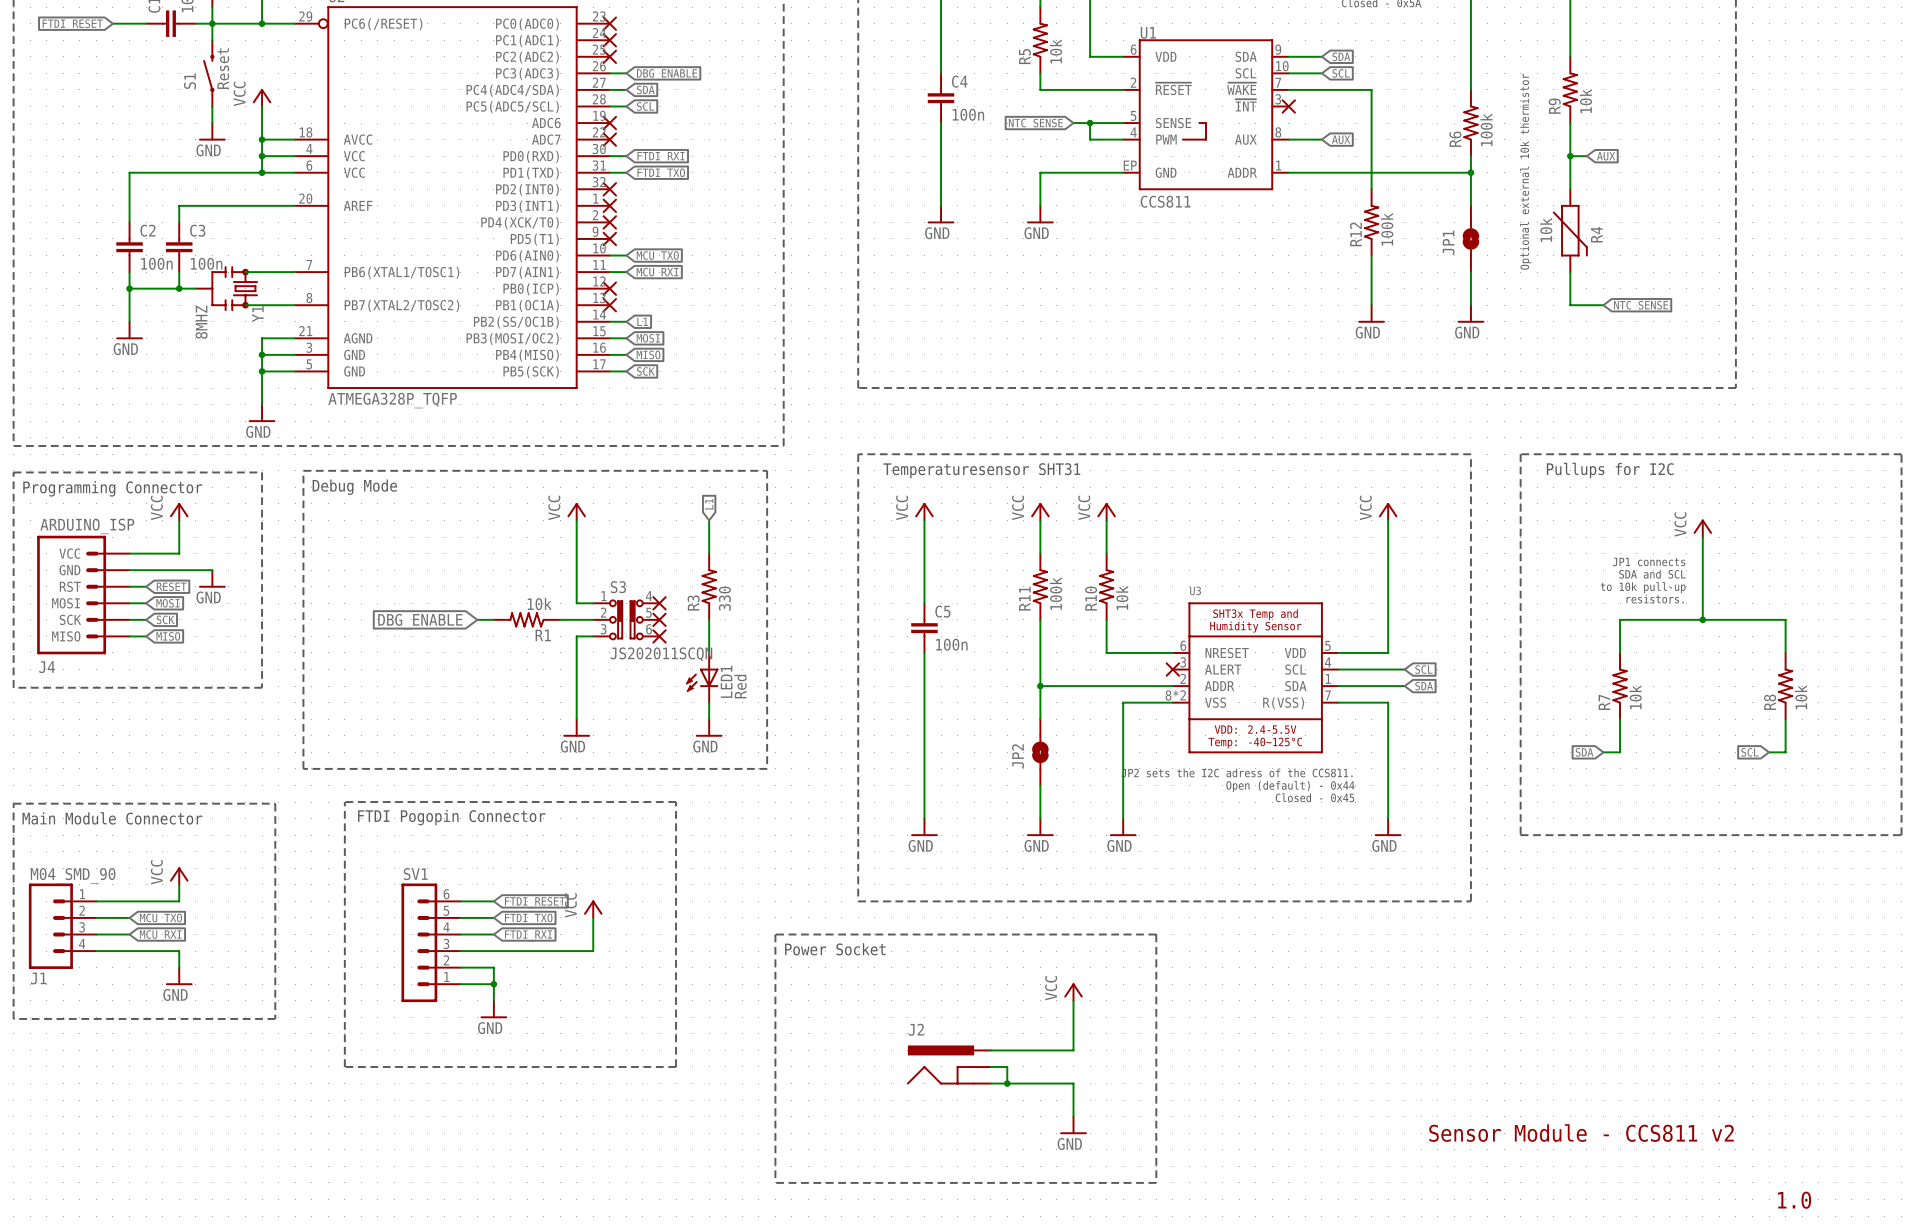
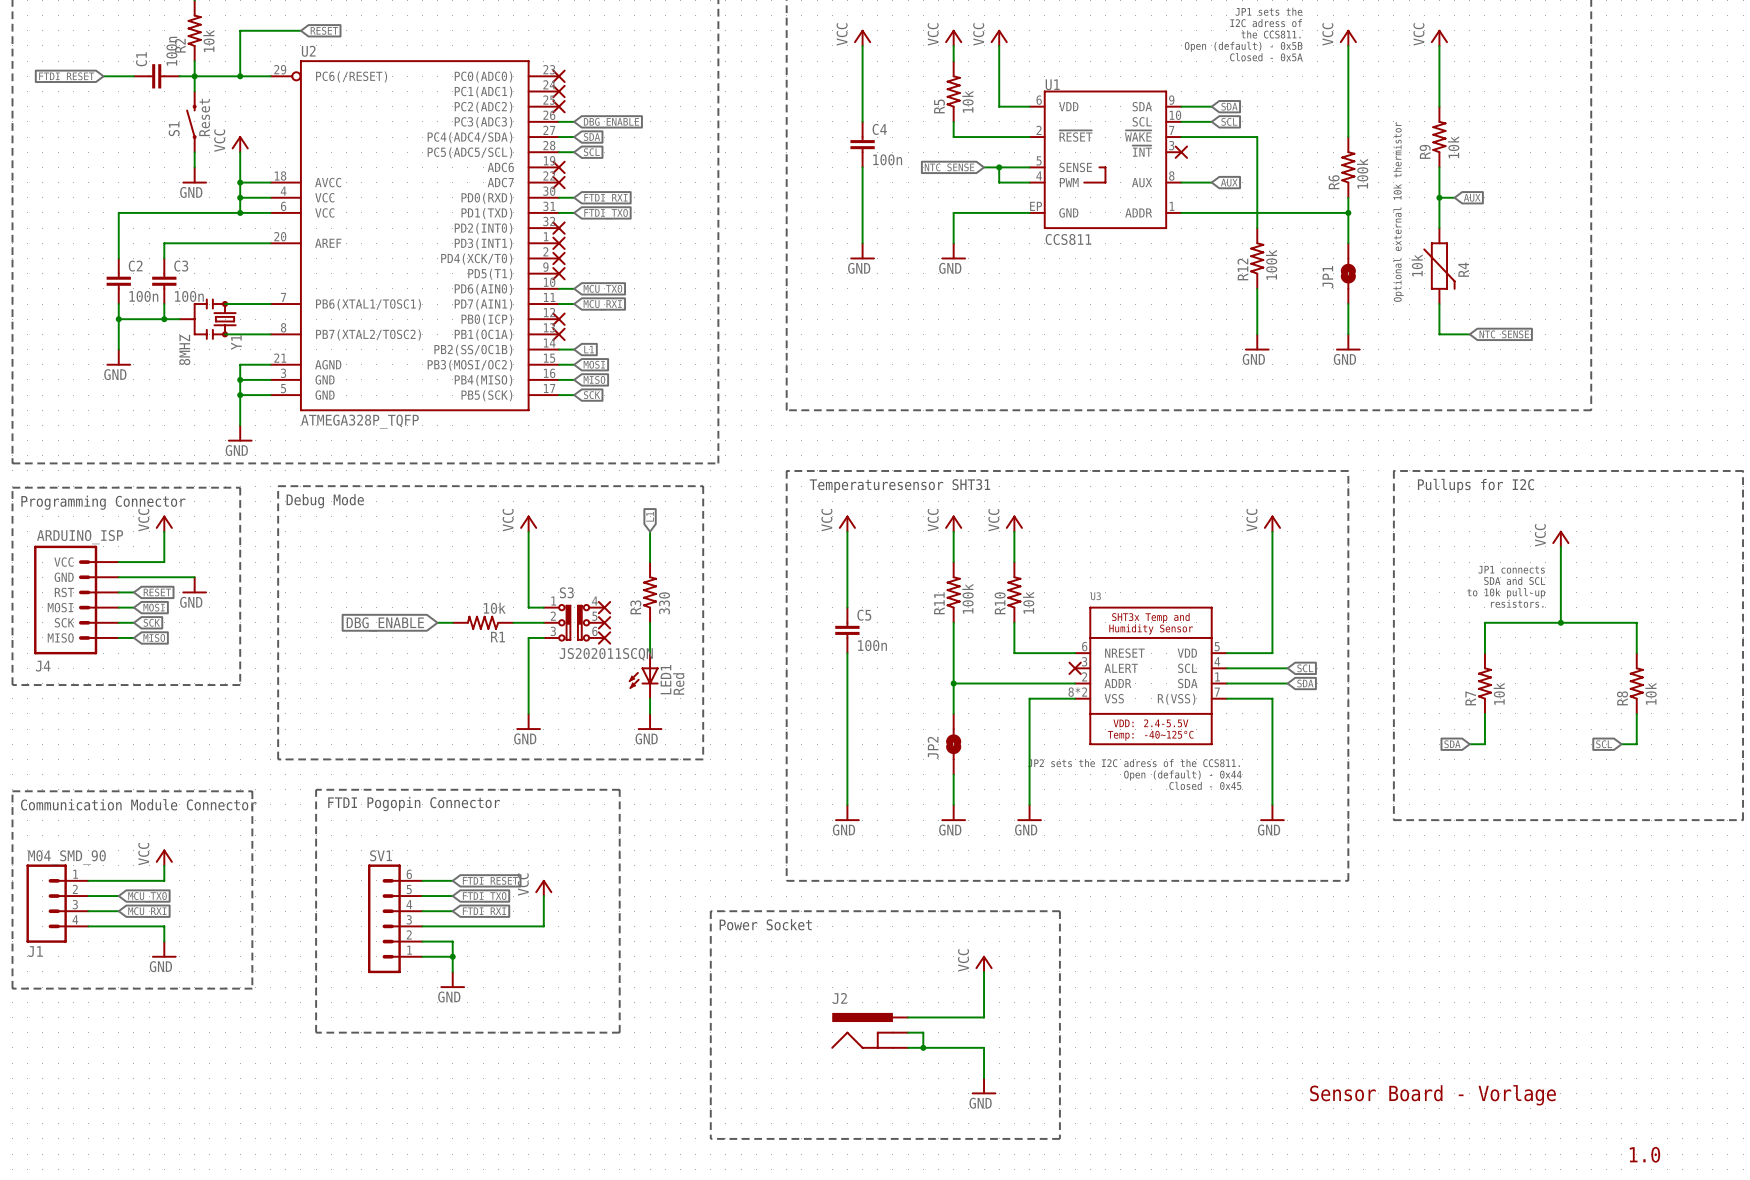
text: Main Module Connector (112, 818) -> Communication Module Connector (138, 804)
text: Sensor Module - CCS811 v2 (1581, 1133) -> Sensor Board - Vorlage (1433, 1095)

